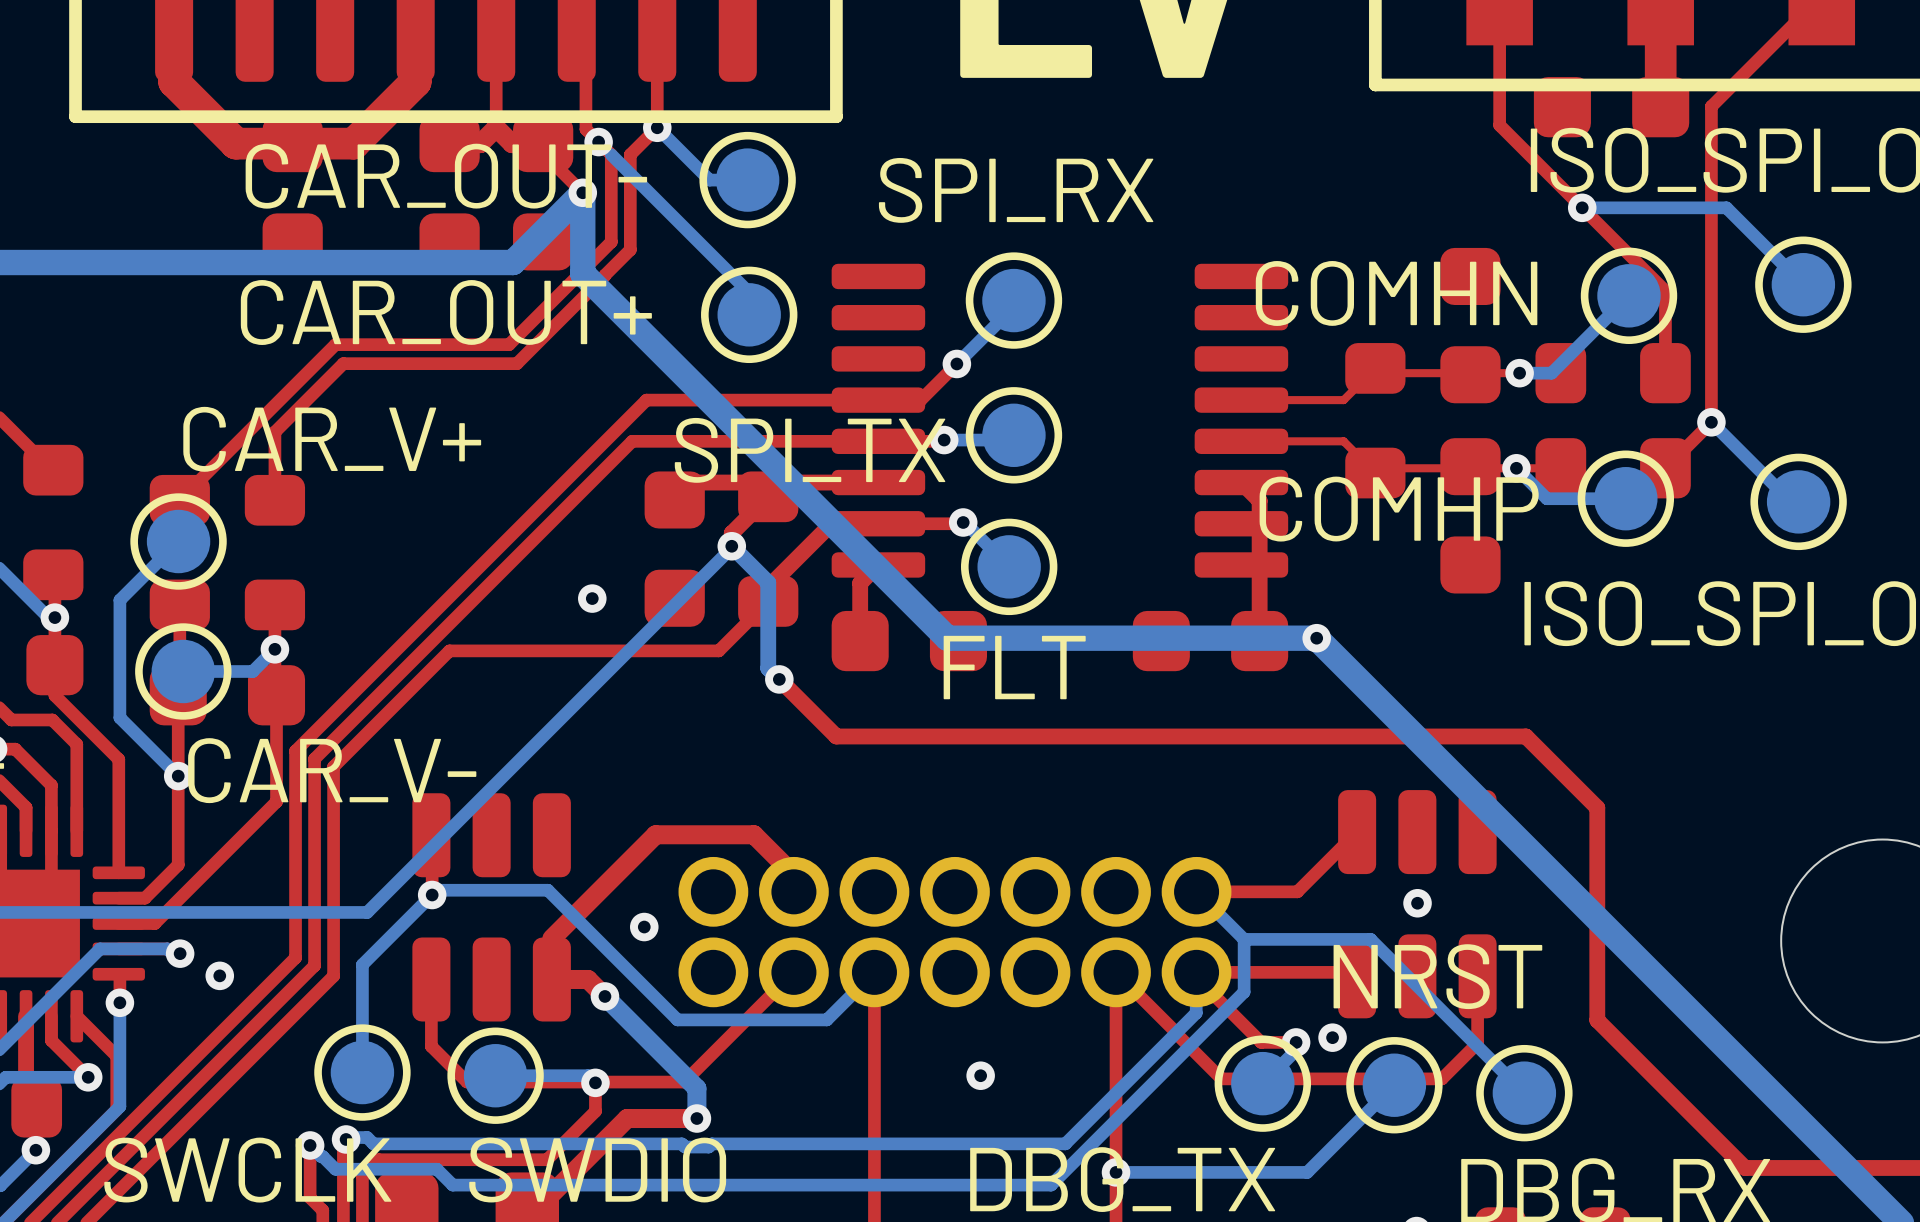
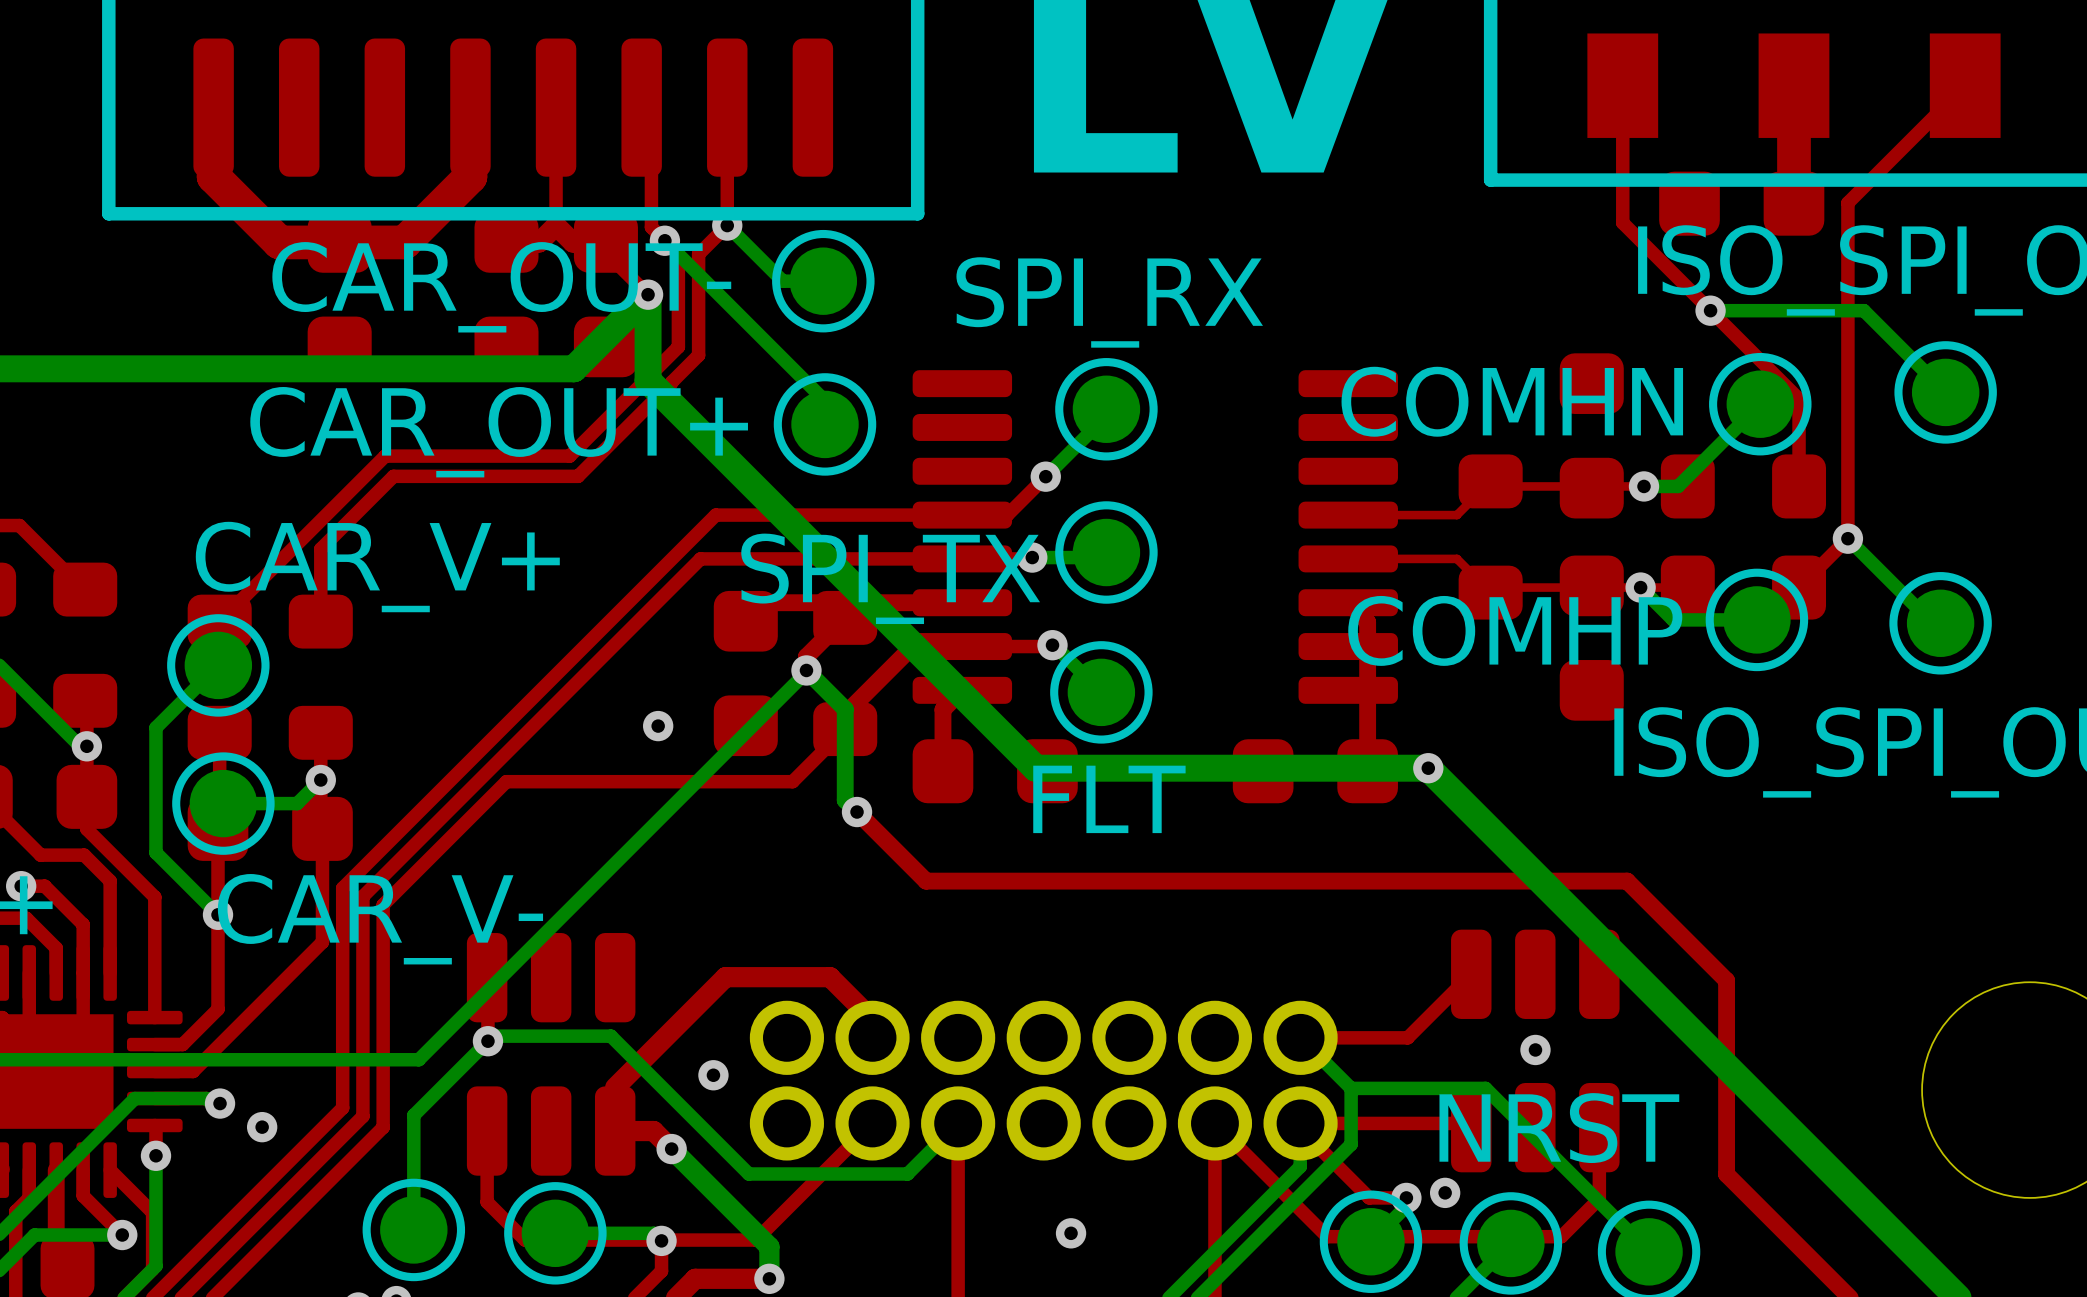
top track: (836, 736) (1525, 736) (1597, 807) (1597, 837) -> (917, 872) (926, 881) (1627, 881) (1726, 980)

